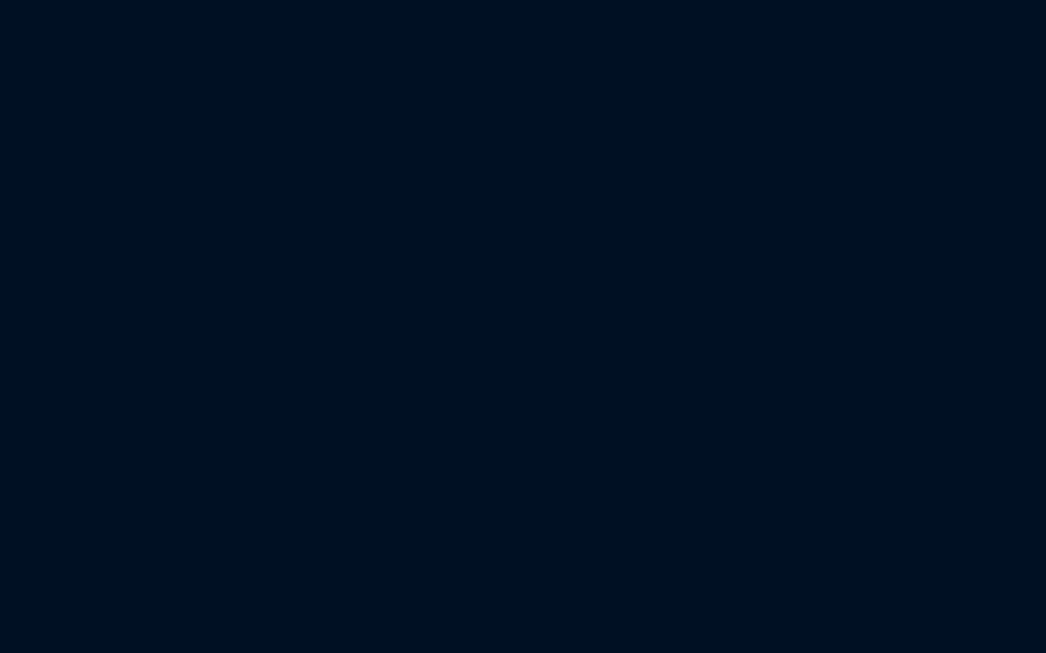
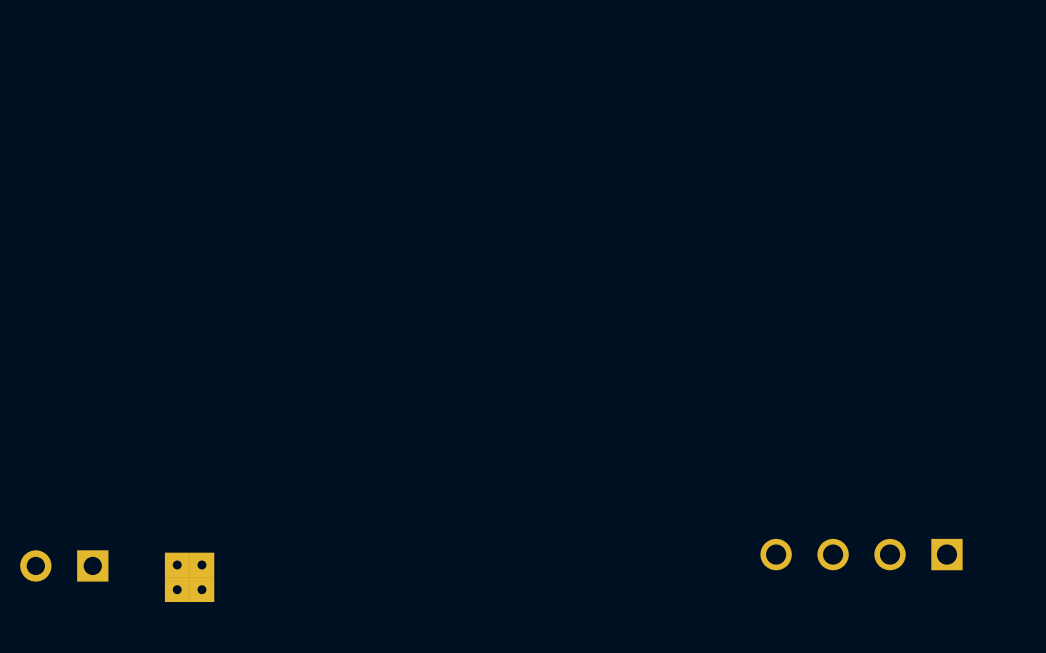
part: none -> (861, 554)
part: none -> (64, 565)
part: none -> (189, 577)

